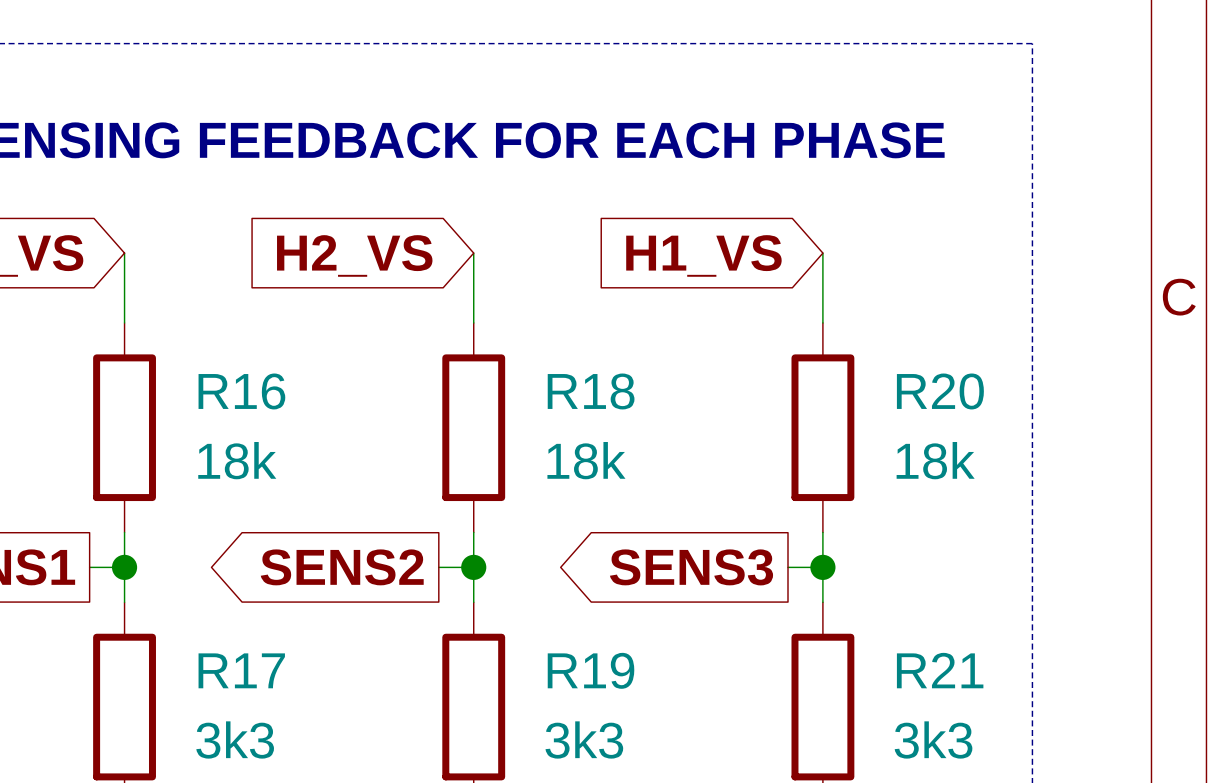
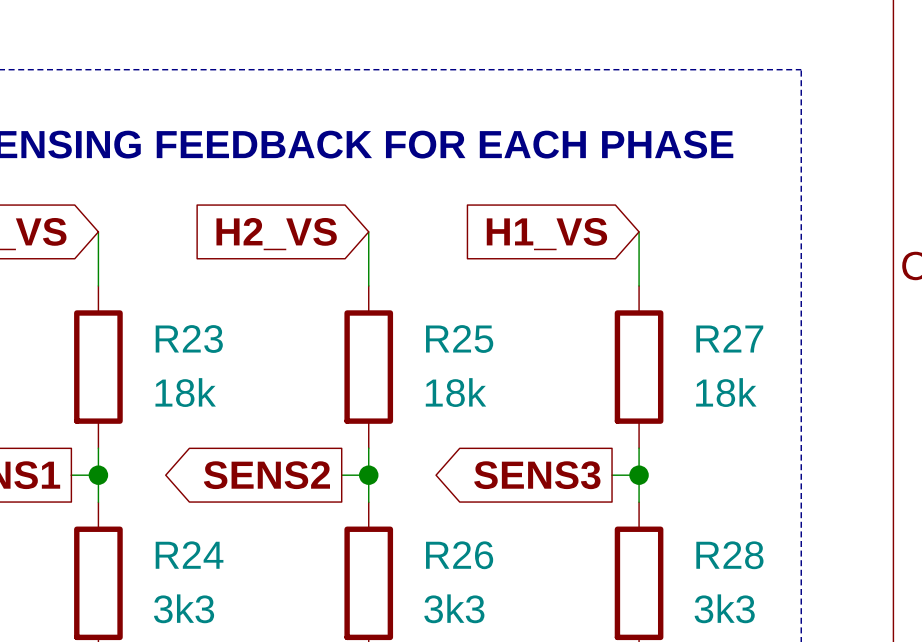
R16 name: R16 (241, 391) -> R23 (189, 339)
R18 name: R18 (591, 391) -> R25 (459, 339)
R20 name: R20 (940, 391) -> R27 (729, 338)
R17 name: R17 (241, 670) -> R24 (189, 555)
R19 name: R19 (591, 670) -> R26 (459, 555)
R21 name: R21 (940, 670) -> R28 (729, 555)

